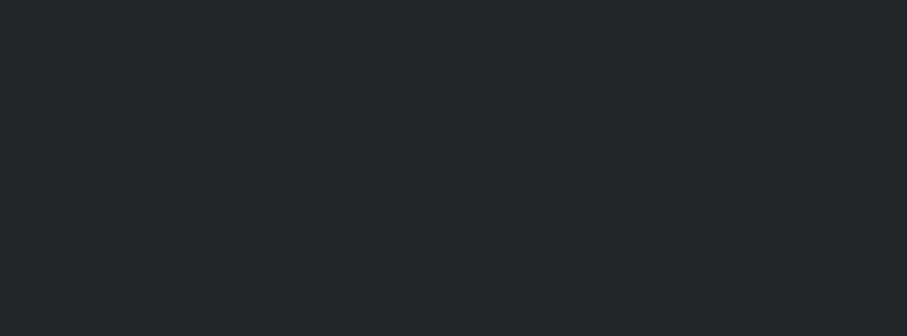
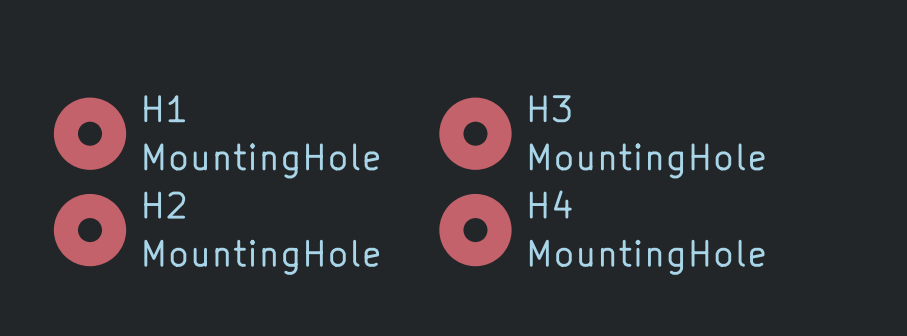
H1: none -> MountingHole (90, 133)
H3: none -> MountingHole (475, 133)
H2: none -> MountingHole (90, 230)
H4: none -> MountingHole (475, 230)

